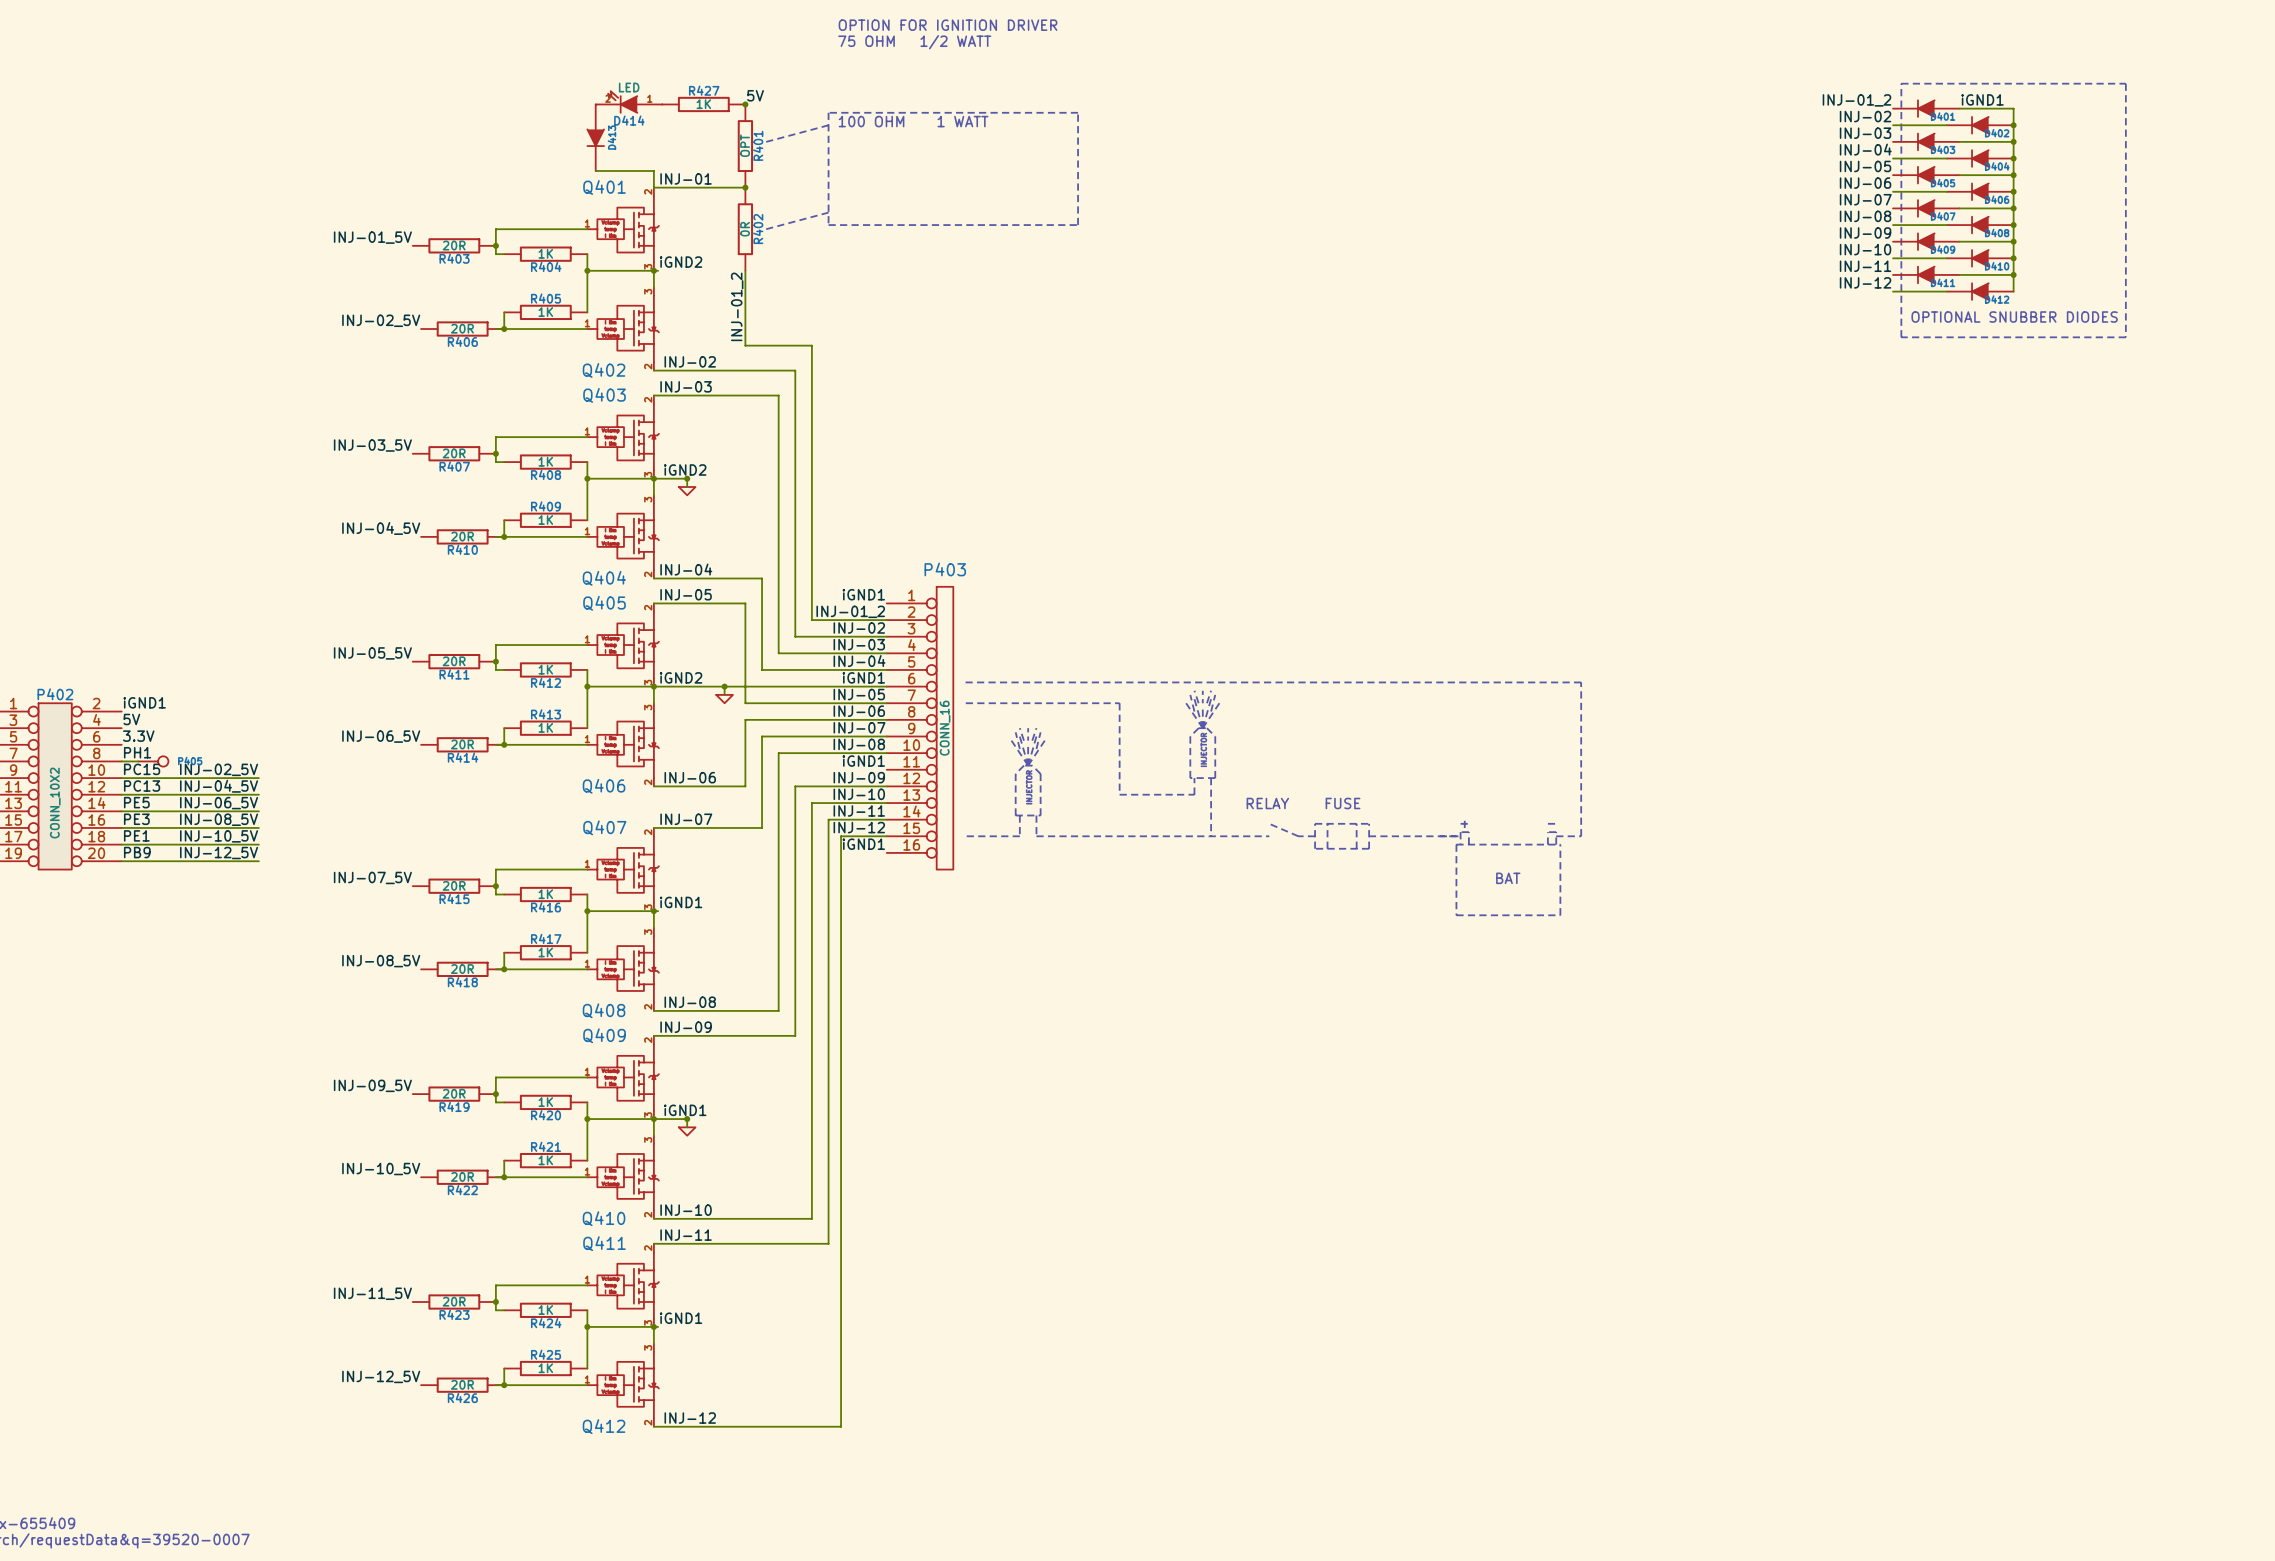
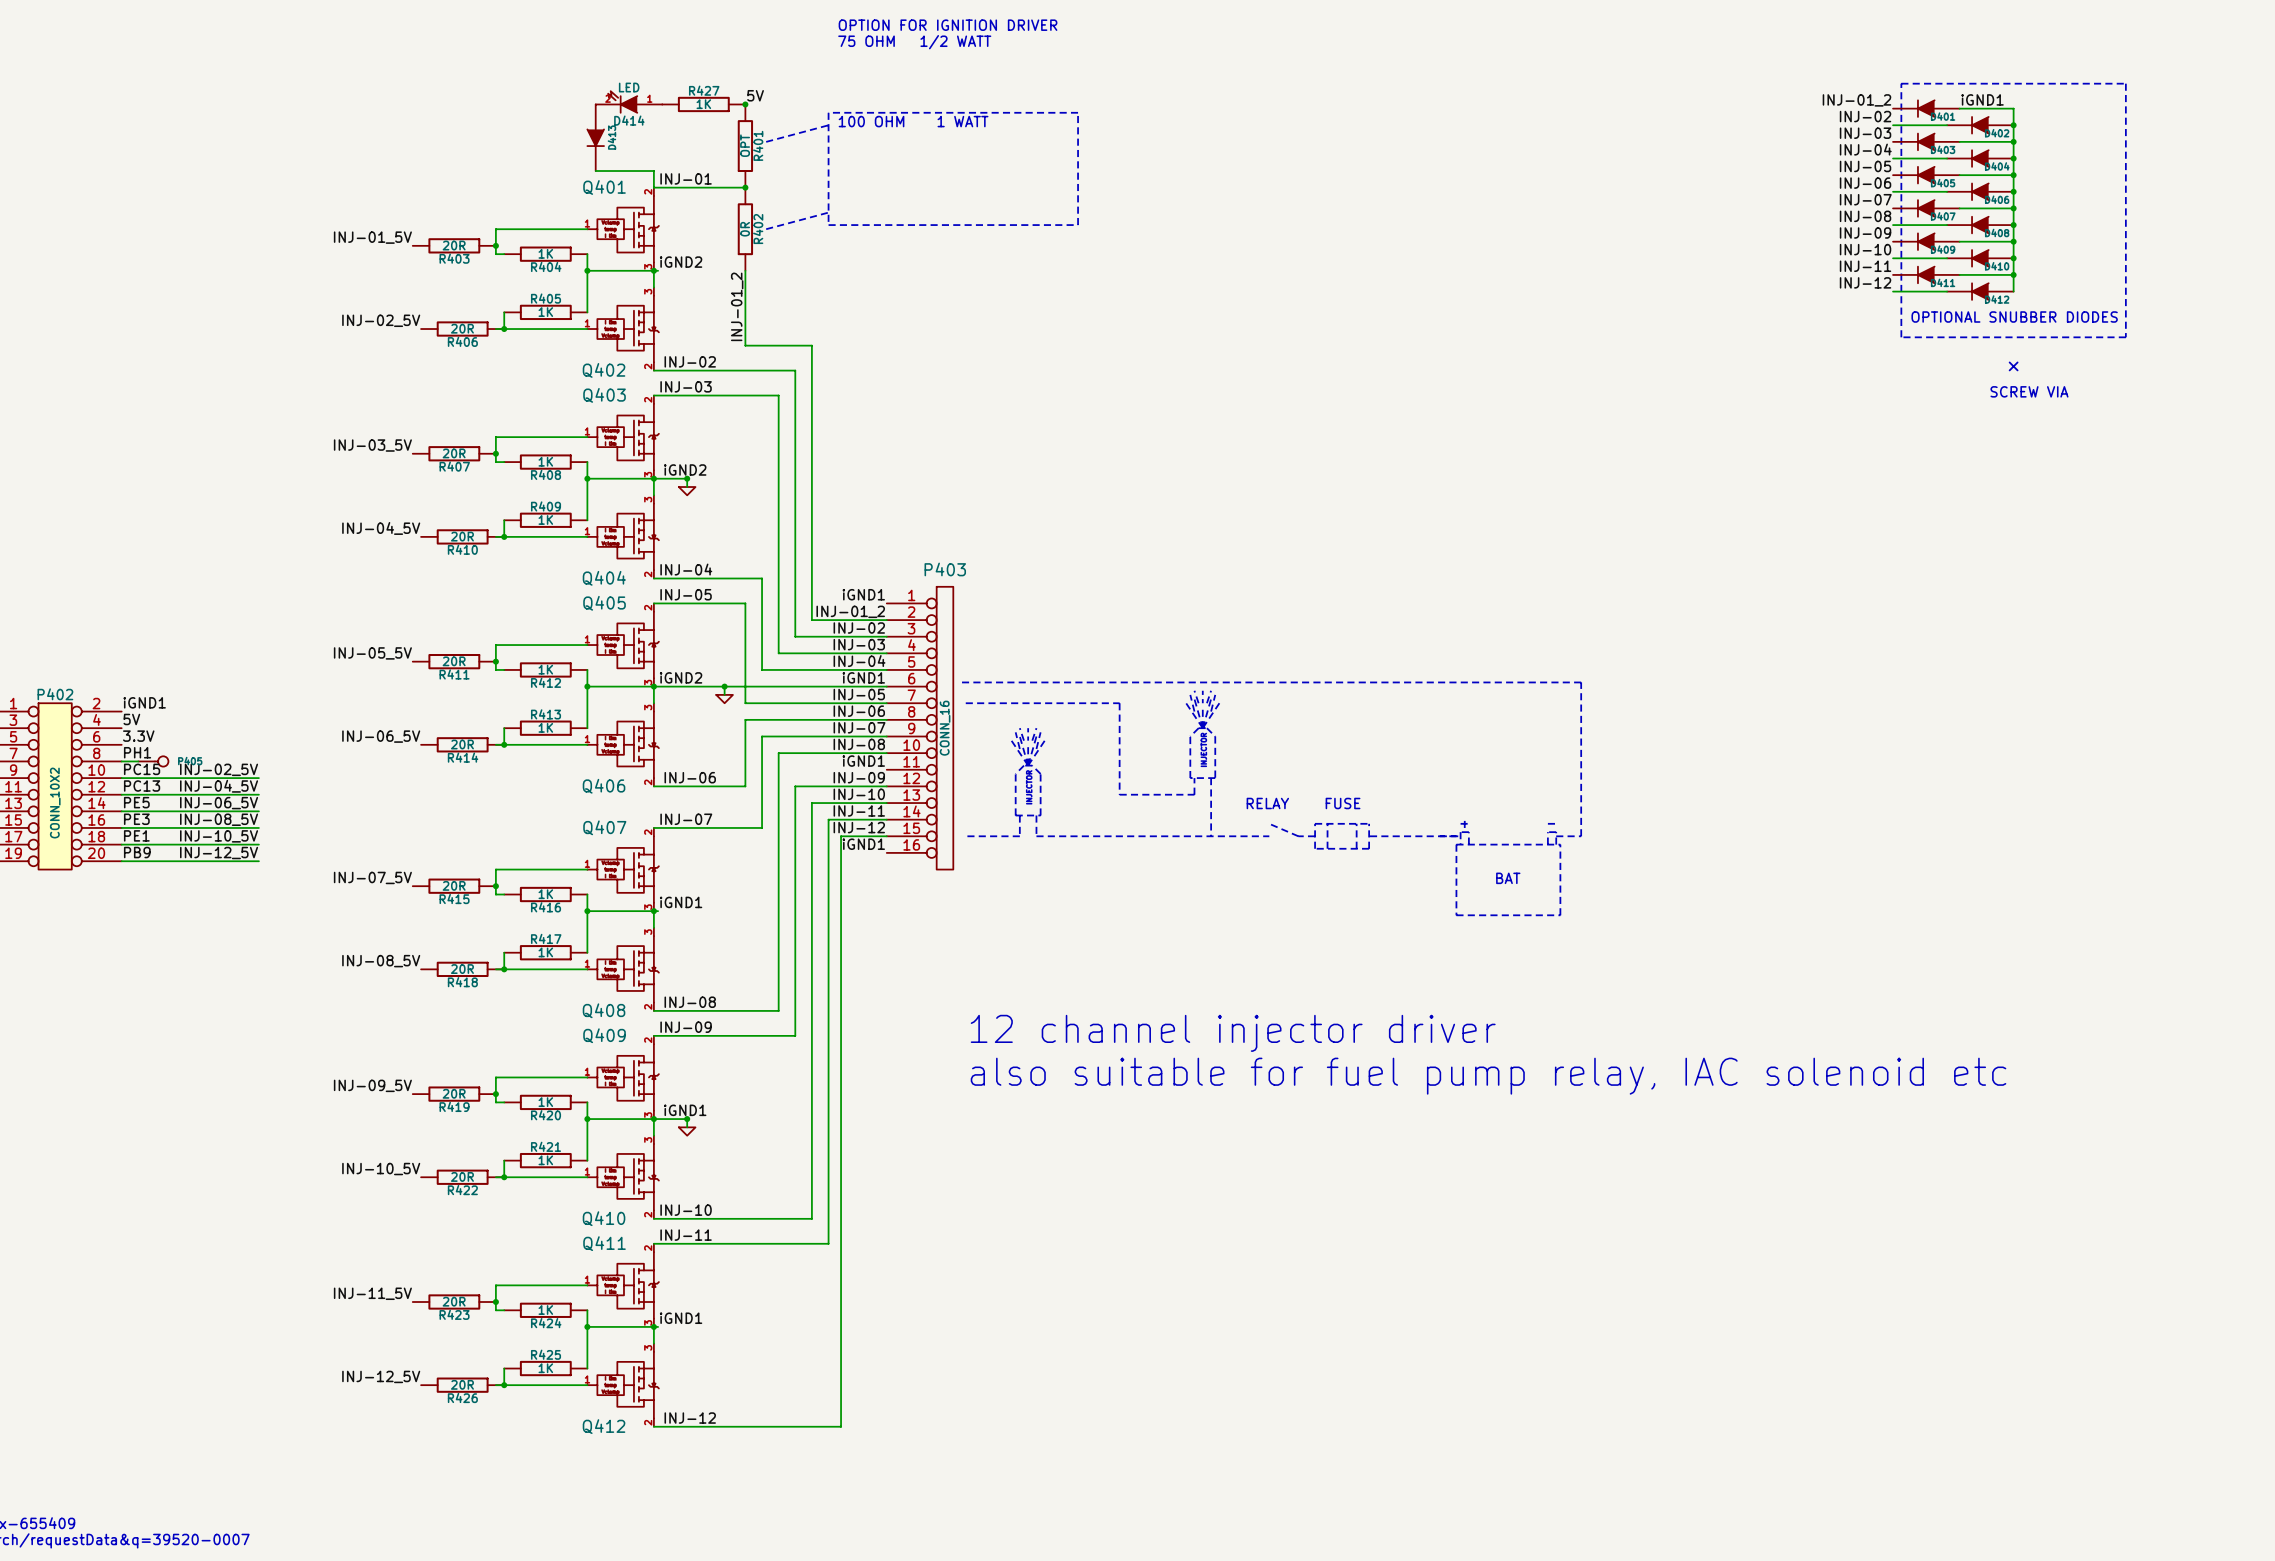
no-connect mark: none -> (2013, 366)
text: none -> SCREW VIA (2029, 391)
text: none -> 12 channel injector driver (1233, 1033)
text: none -> also suitable for fuel pump relay, IAC solenoid etc (1488, 1076)

